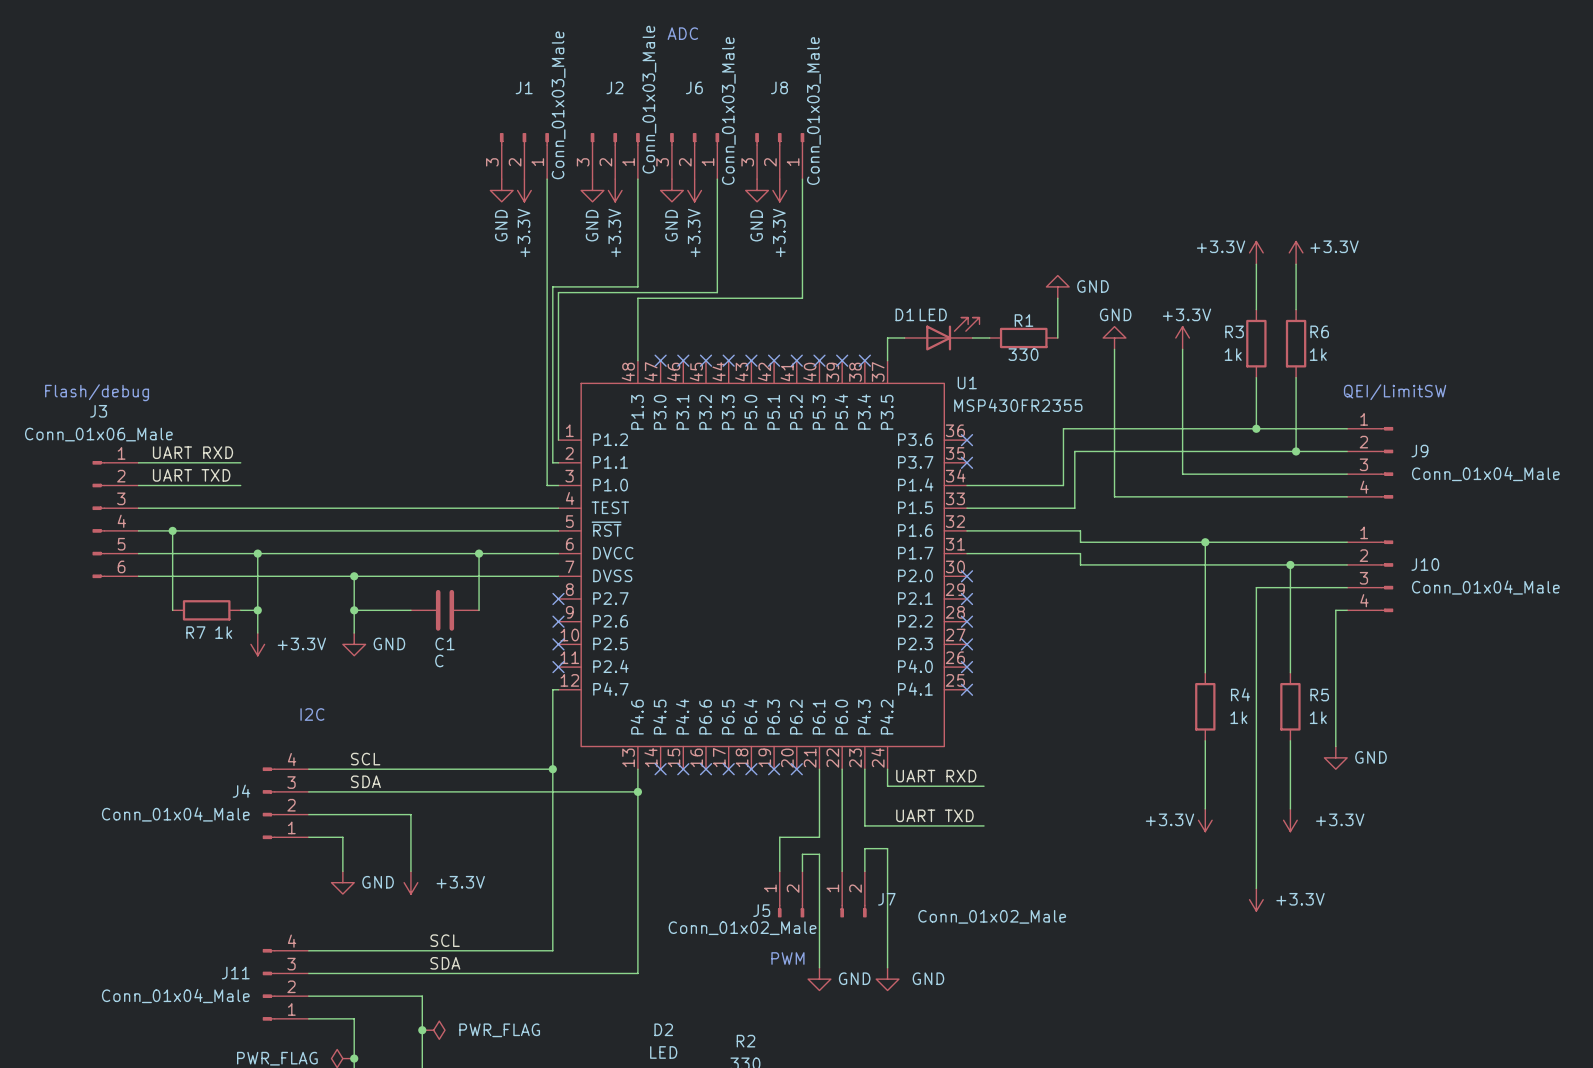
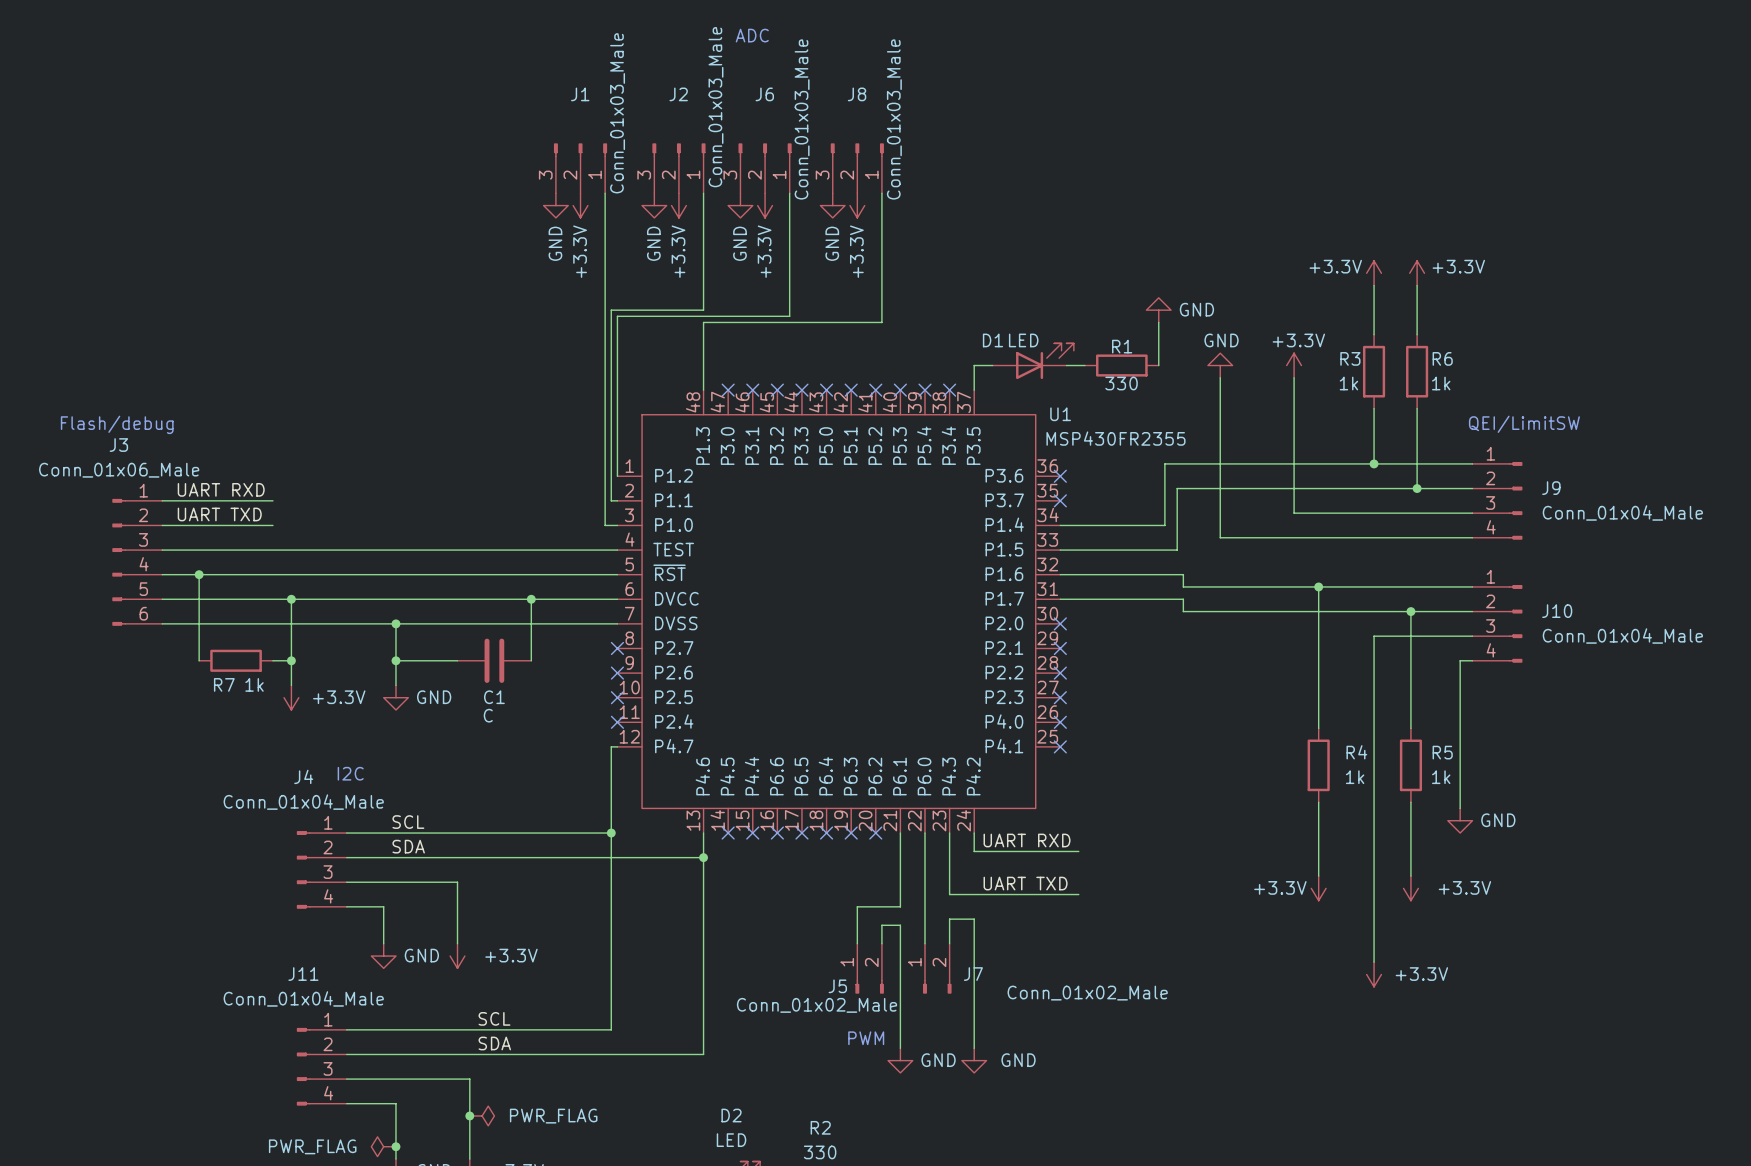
J4 name position: J4 (241, 791) -> J4 (303, 776)
J4 flip: as is (269, 803) -> up-down (303, 869)
J4 value position: Conn_01x04_Male (175, 814) -> Conn_01x04_Male (303, 802)
J11 name position: J11 (235, 973) -> J11 (303, 974)
J11 flip: as is (269, 984) -> up-down (303, 1066)
J11 value position: Conn_01x04_Male (175, 996) -> Conn_01x04_Male (303, 998)

